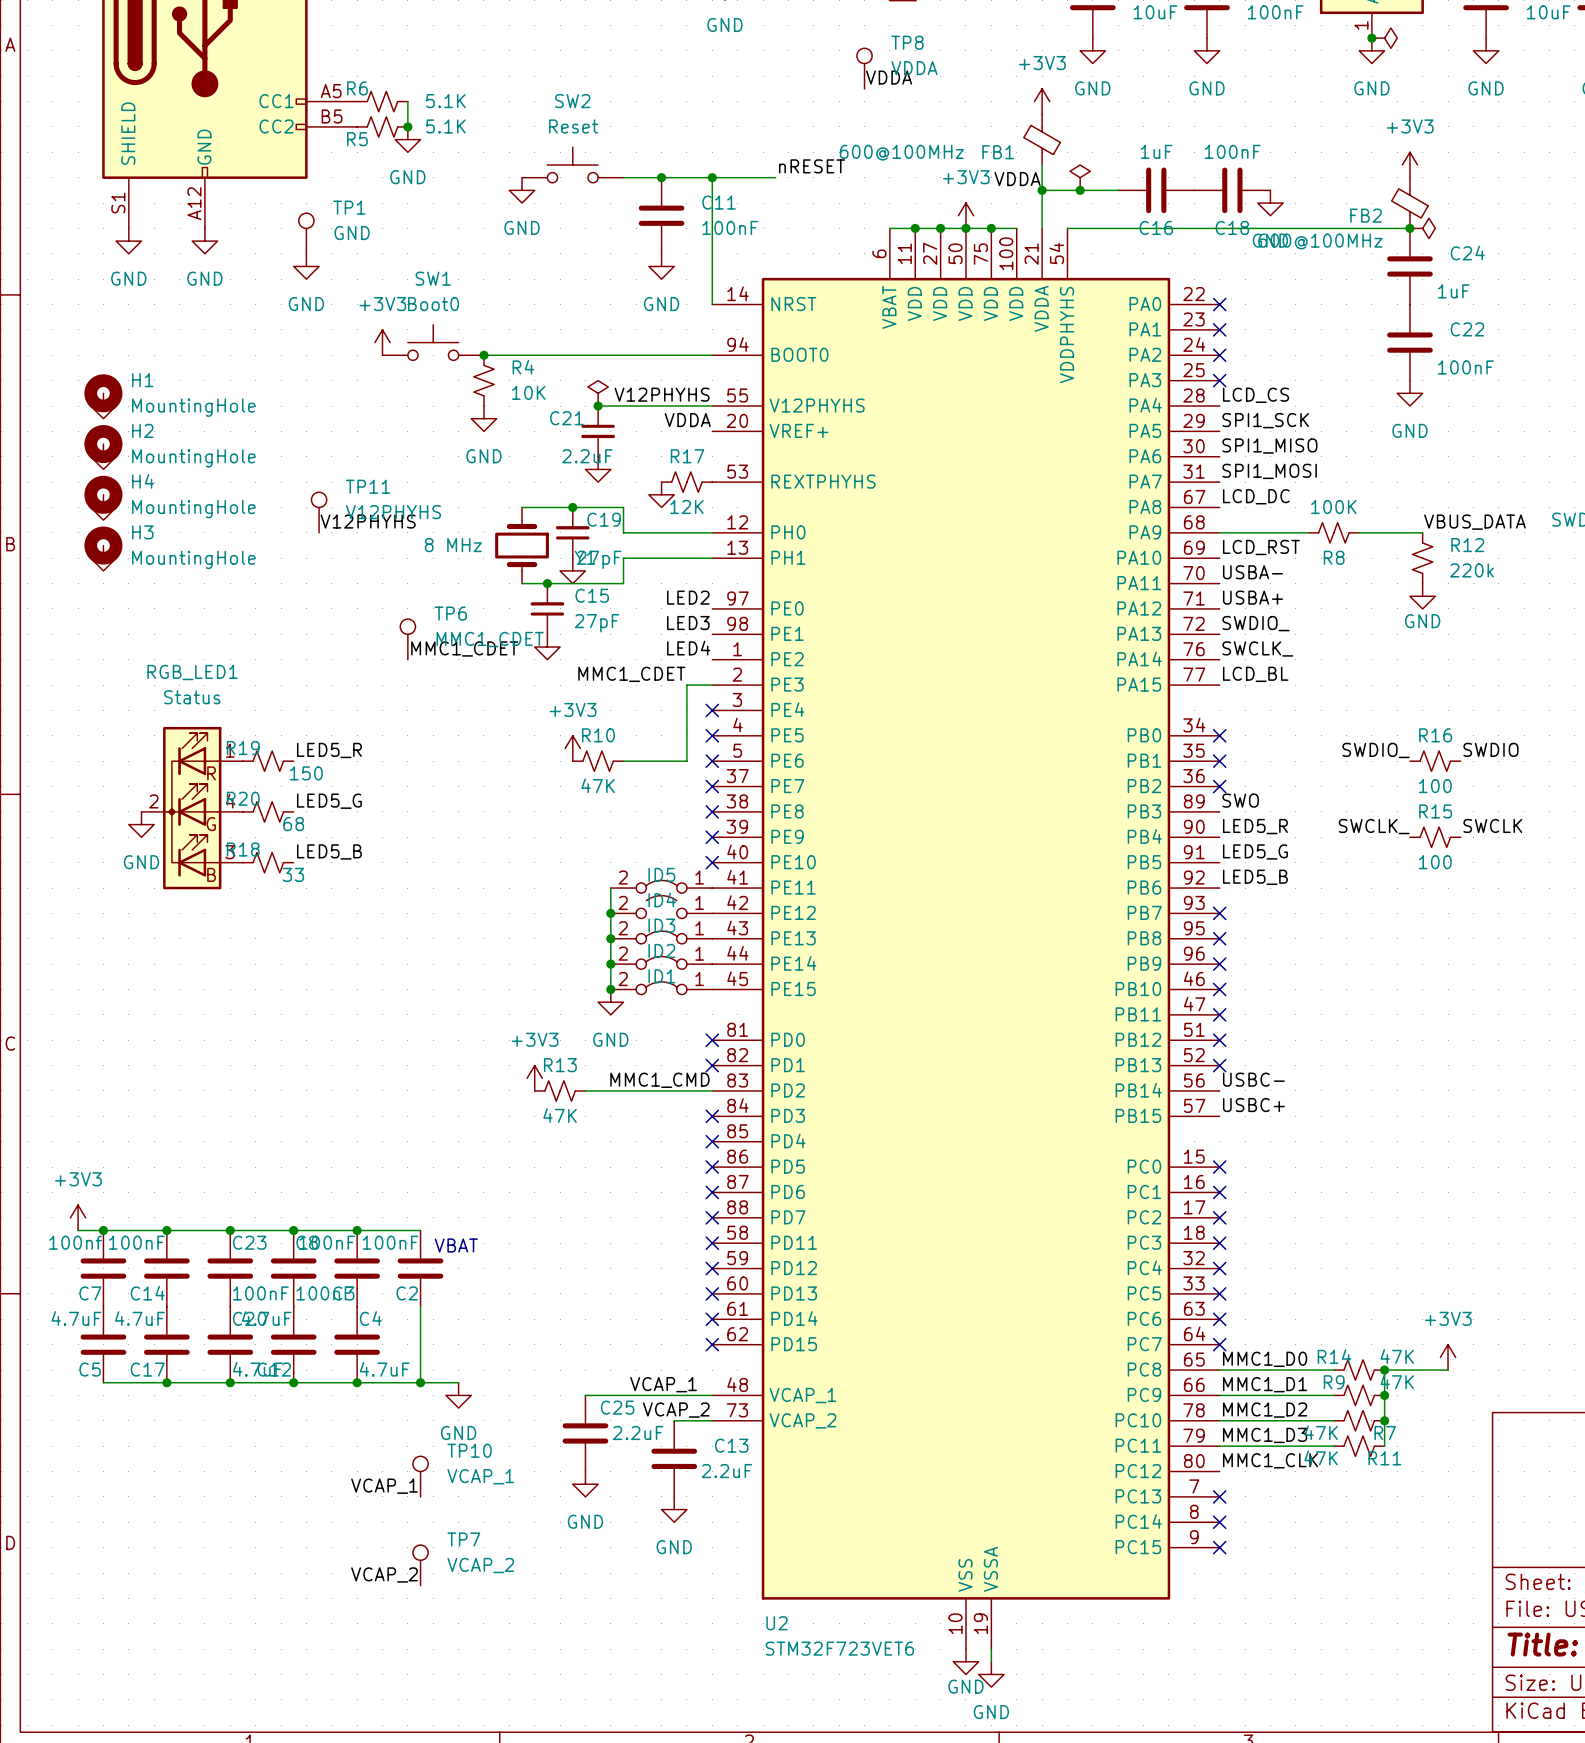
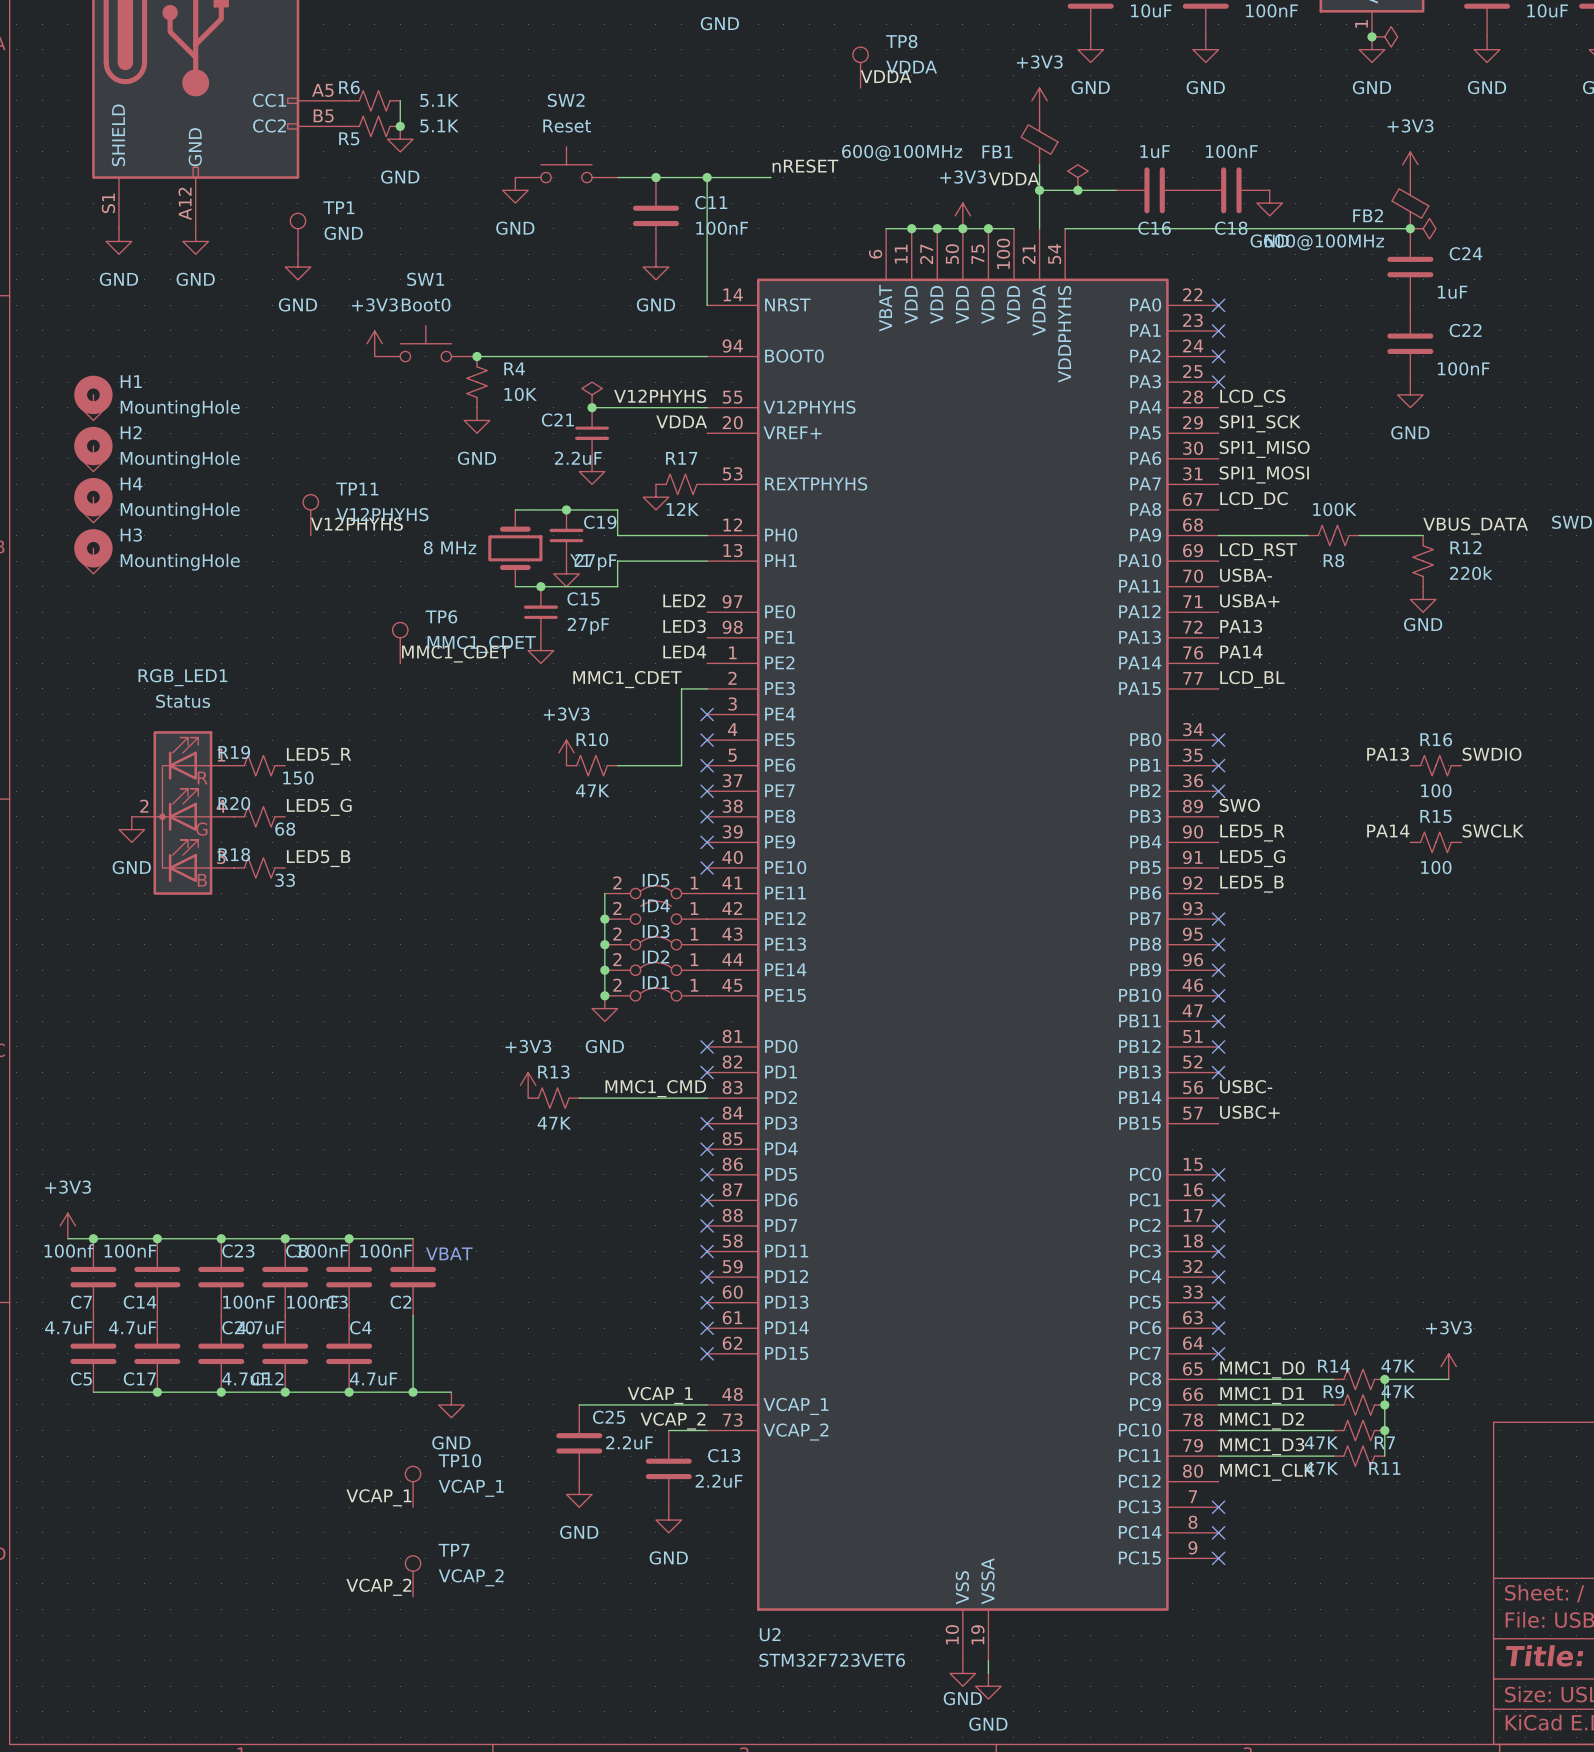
label: SWDIO_ (1256, 623) -> PA13 (1241, 626)
label: SWCLK_ (1257, 648) -> PA14 (1241, 651)
label: SWDIO_ (1376, 750) -> PA13 (1388, 754)
label: SWCLK_ (1374, 826) -> PA14 (1388, 830)

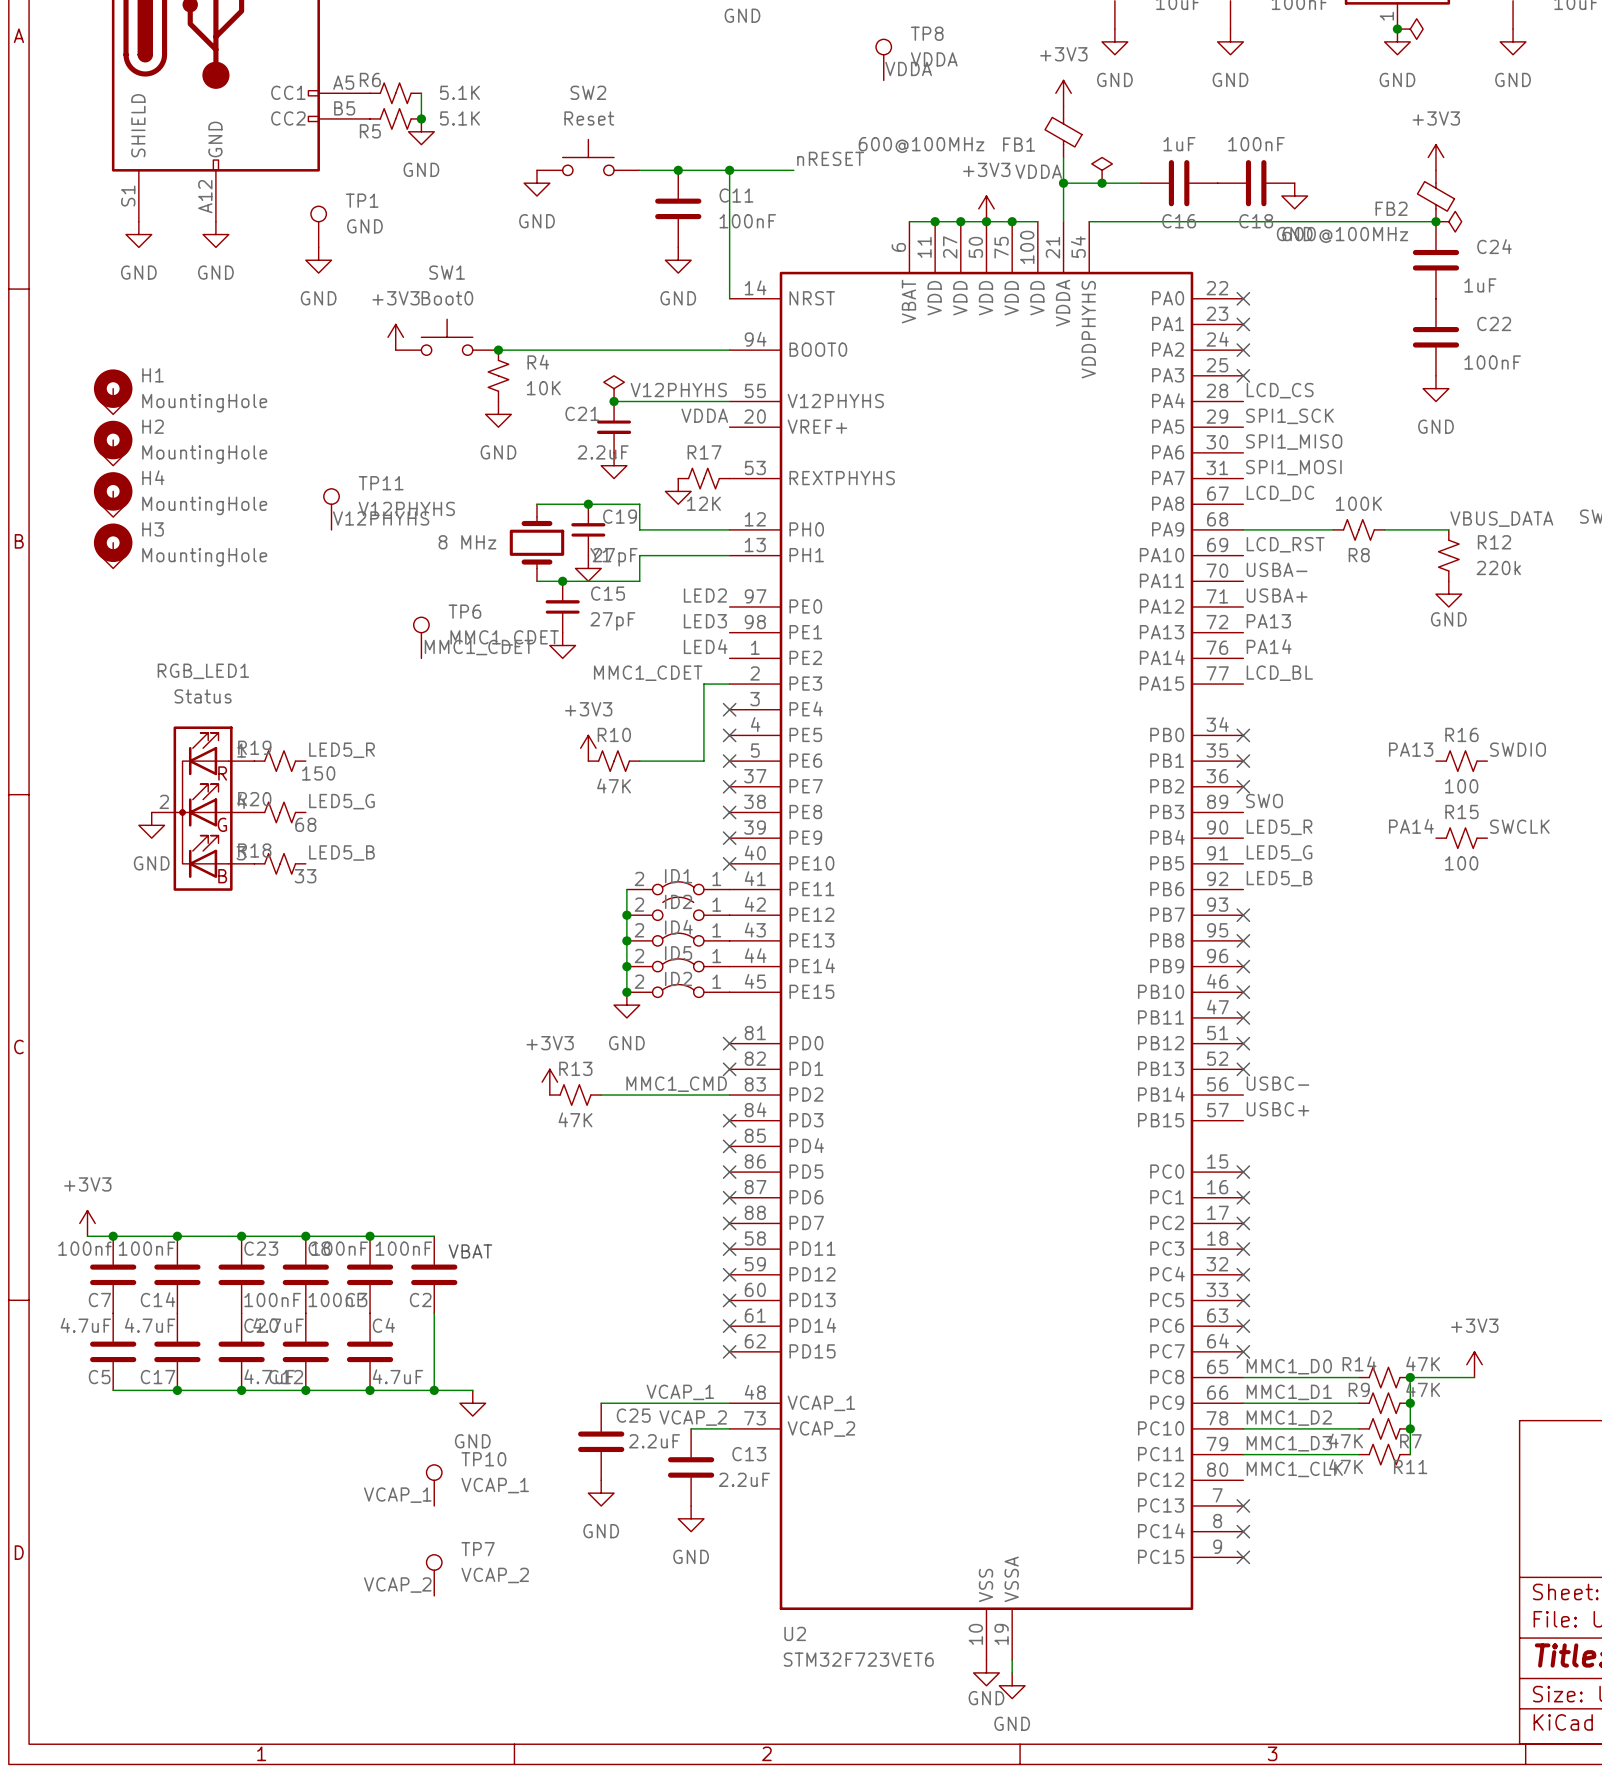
ID5 name: ID5 (656, 880) -> ID1 (678, 876)
ID4 name: ID4 (656, 905) -> ID2 (678, 901)
ID3 name: ID3 (656, 931) -> ID4 (678, 927)
ID2 name: ID2 (655, 956) -> ID5 (678, 953)
ID1 name: ID1 (656, 982) -> ID2 (678, 978)

